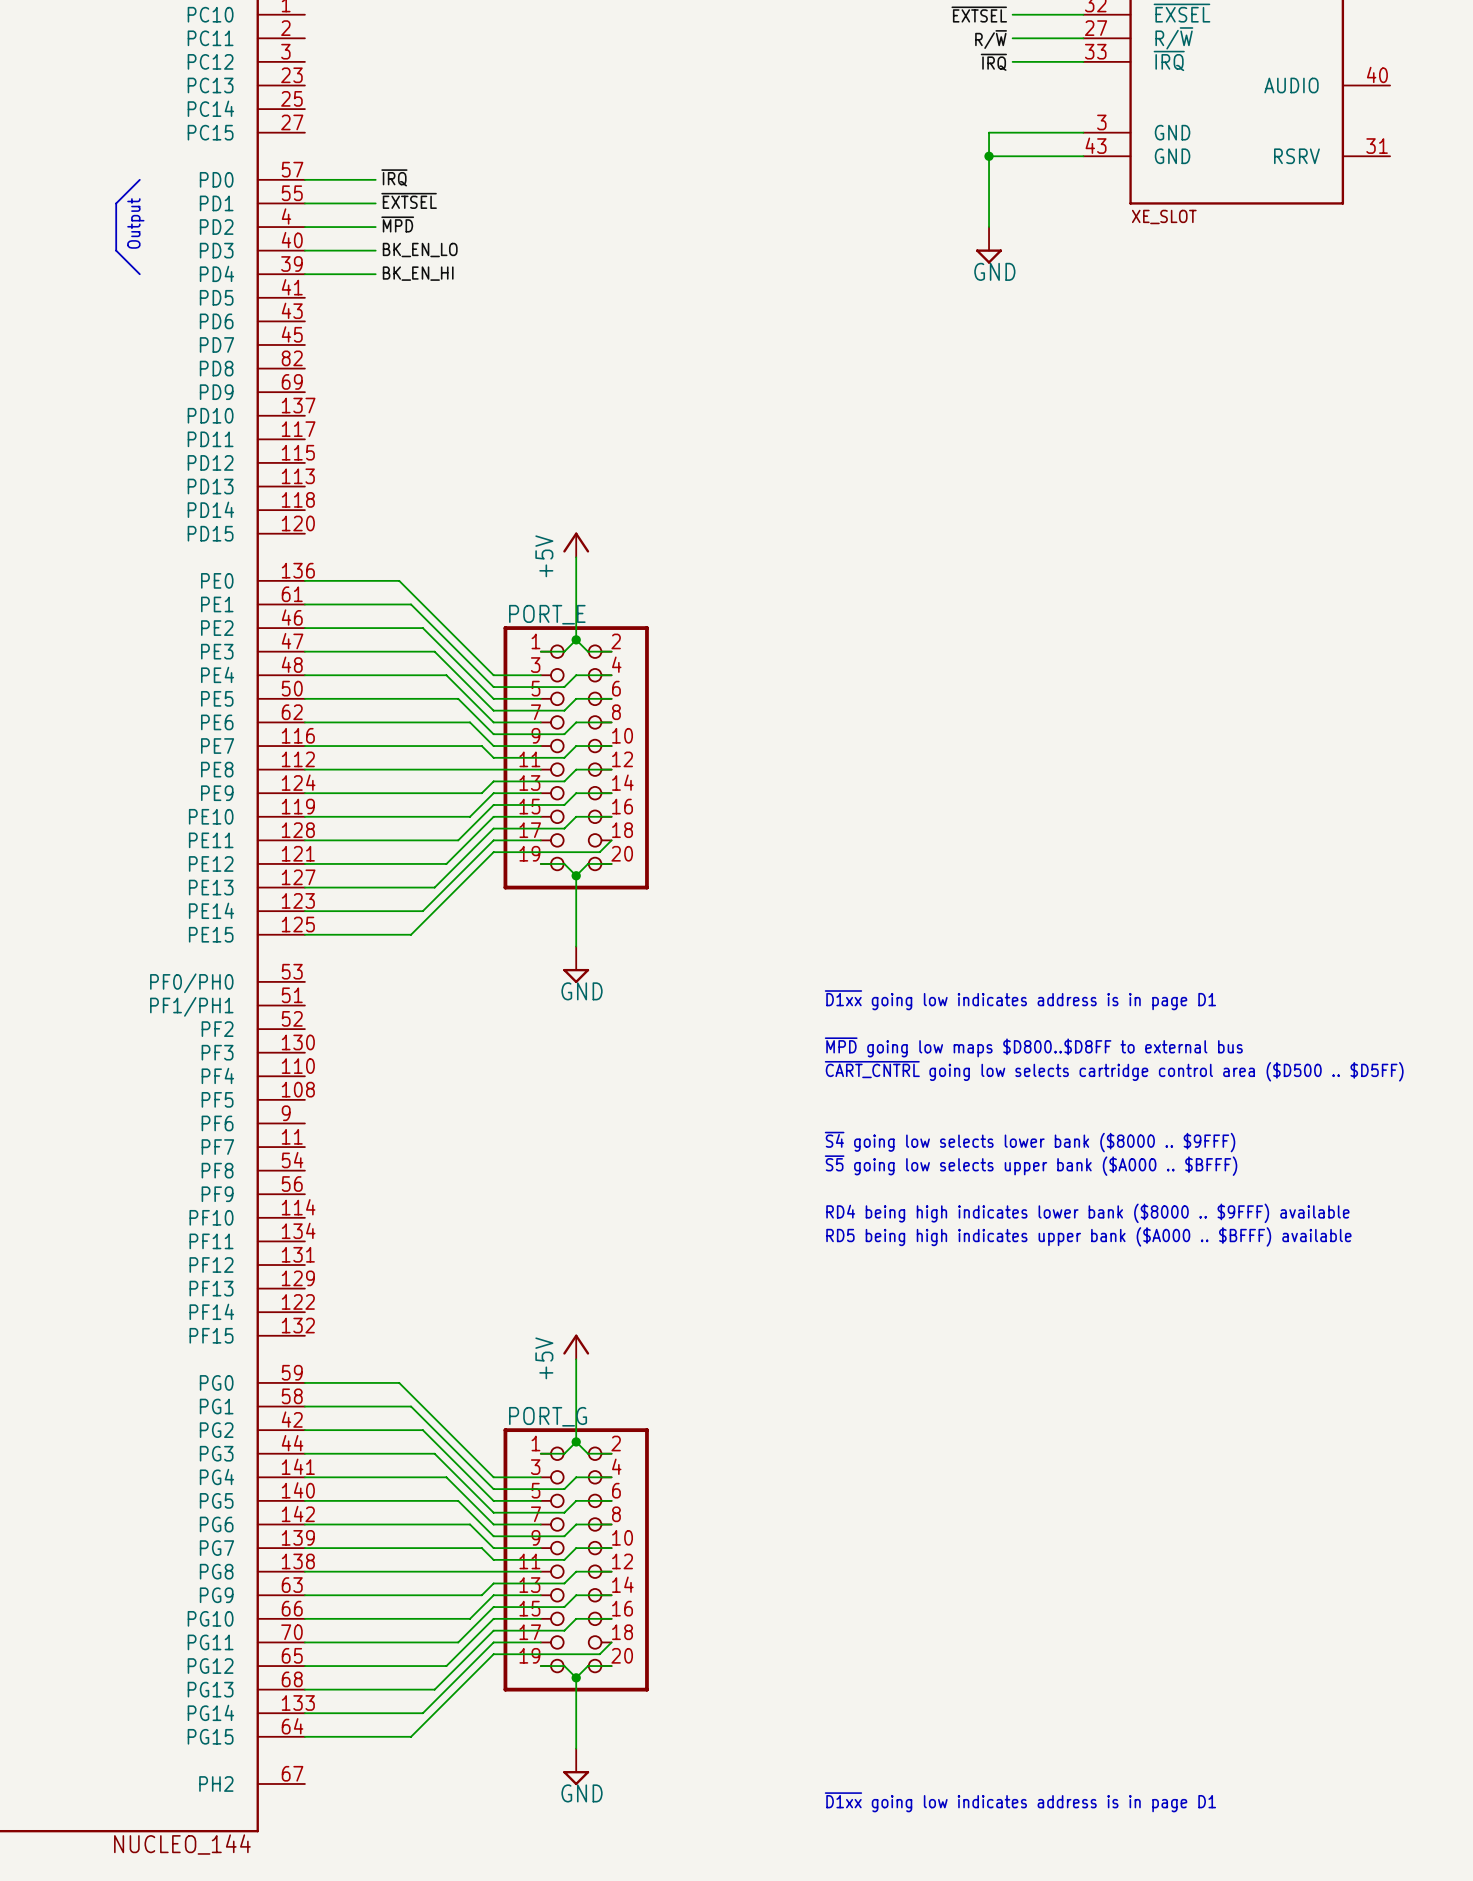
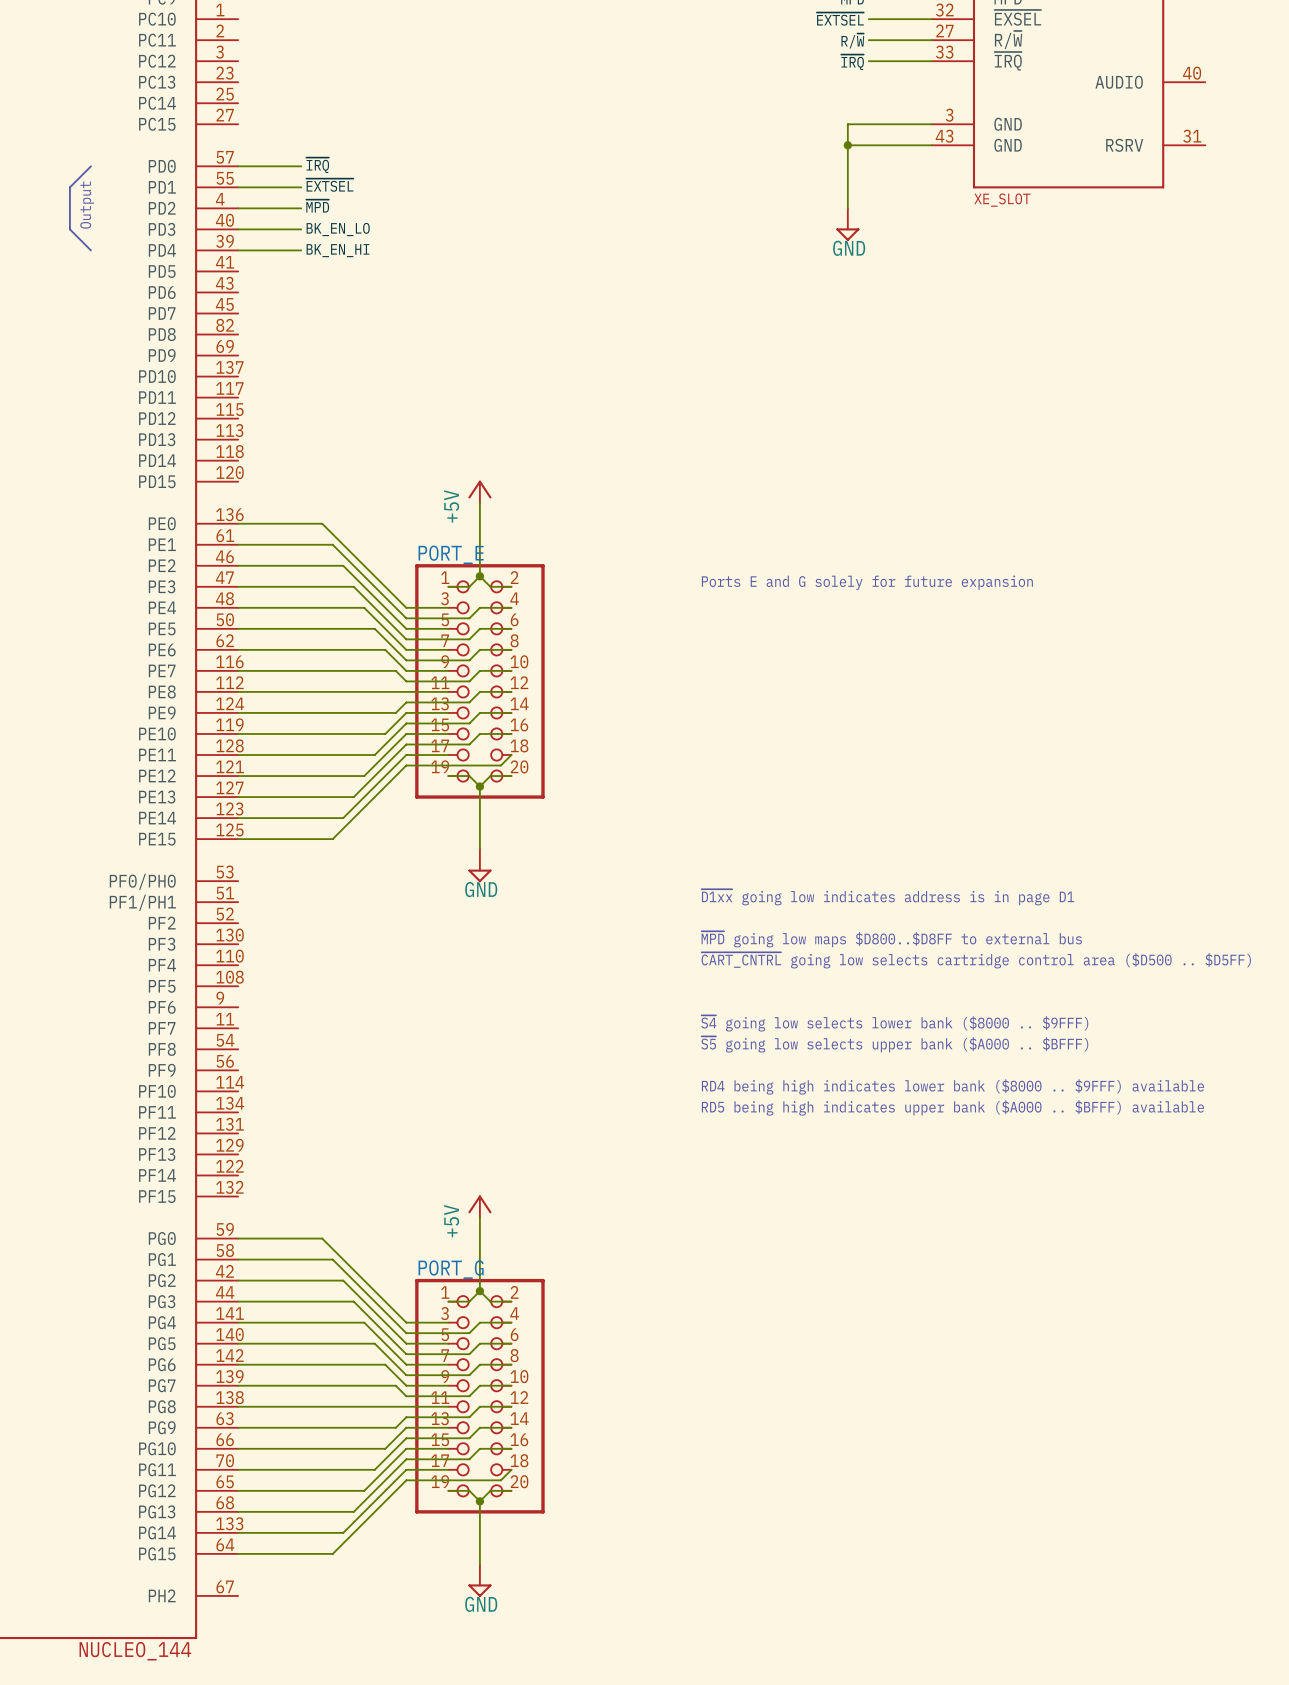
text: none -> Ports E and G solely for future expansion (867, 582)
text: ~{D1xx} going low indicates address is in page D1 (1020, 1802) -> none

